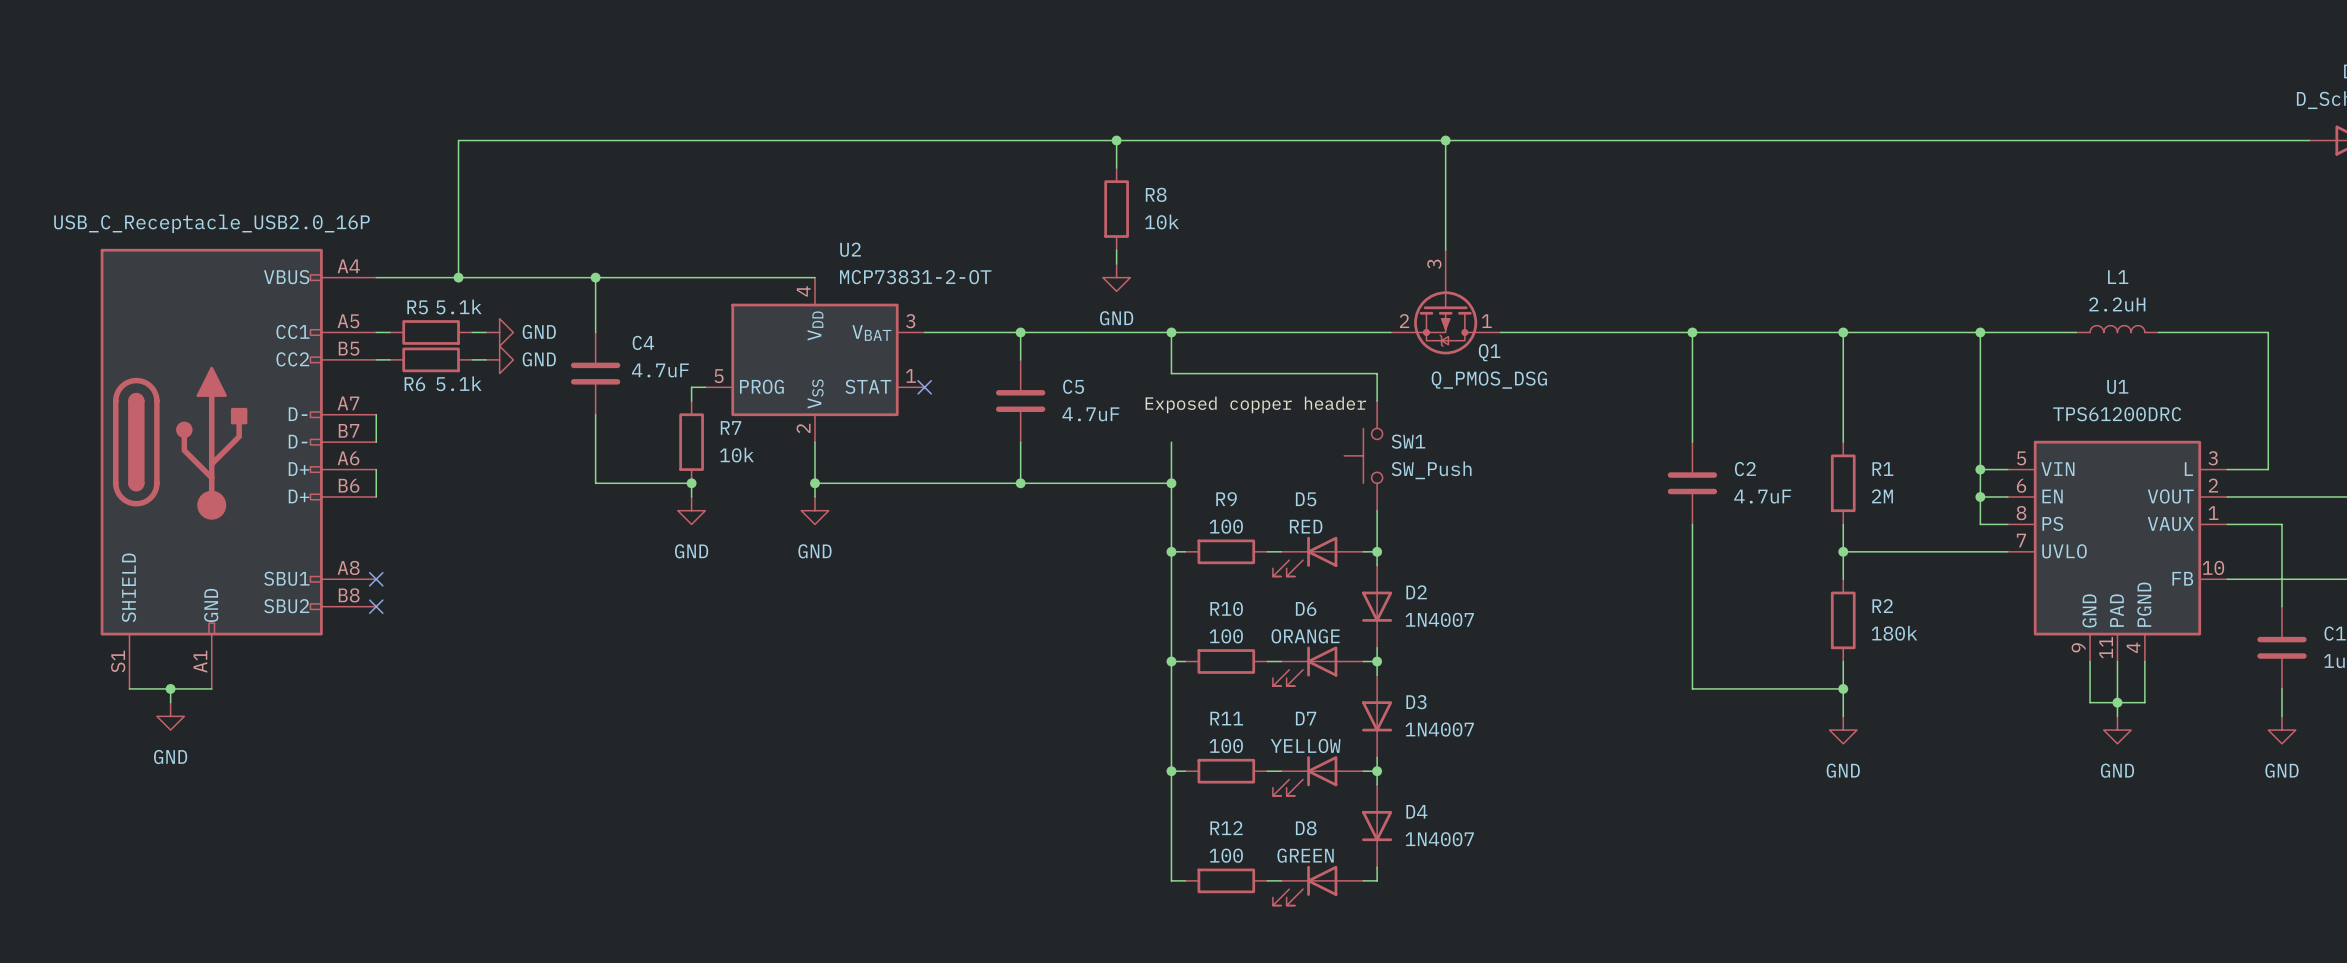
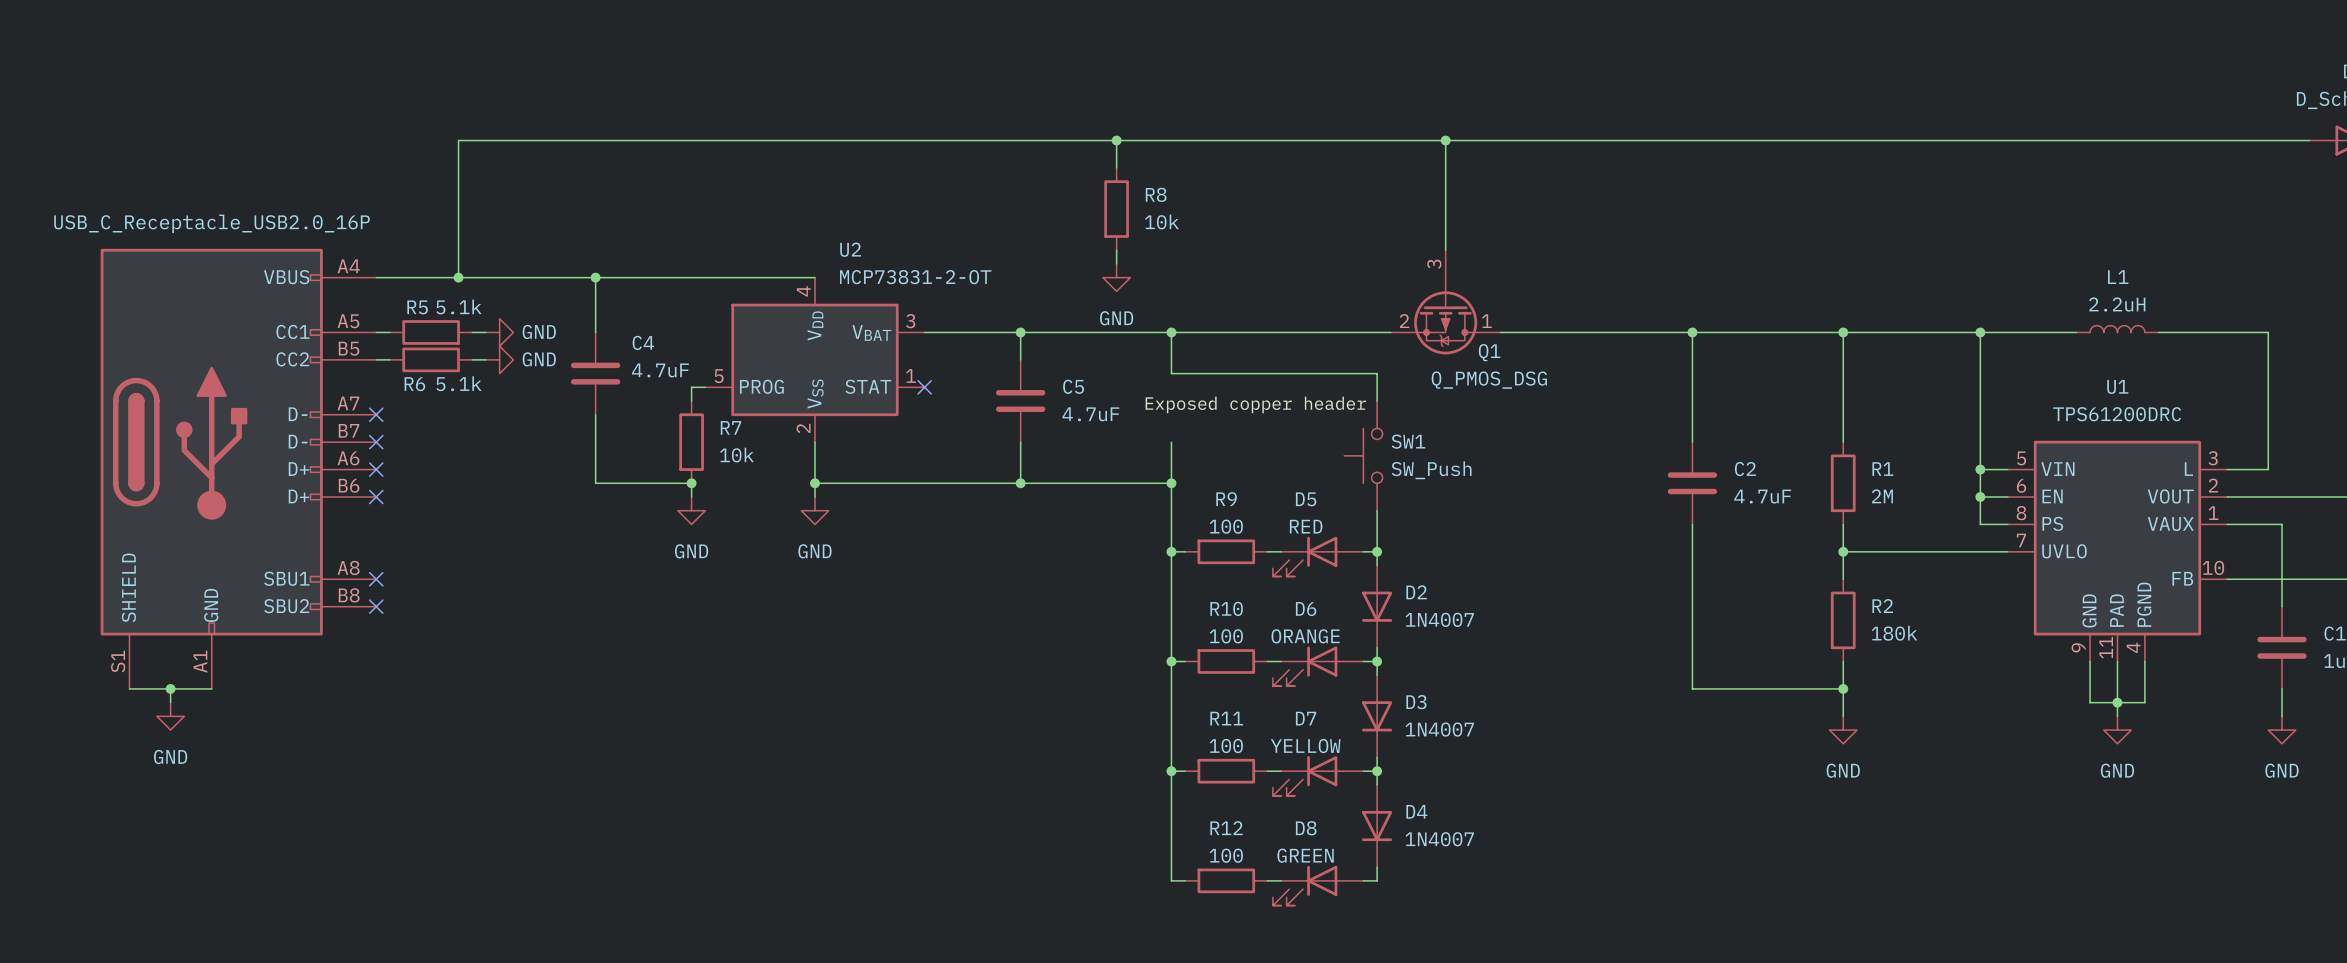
wire: (376, 414) (376, 442) -> none
no-connect mark: none -> (376, 414)
no-connect mark: none -> (376, 442)
wire: (376, 469) (376, 496) -> none
no-connect mark: none -> (376, 469)
no-connect mark: none -> (376, 496)

